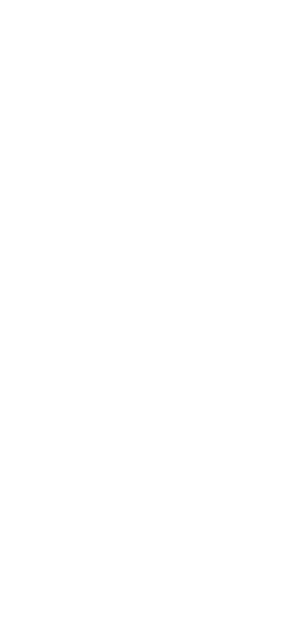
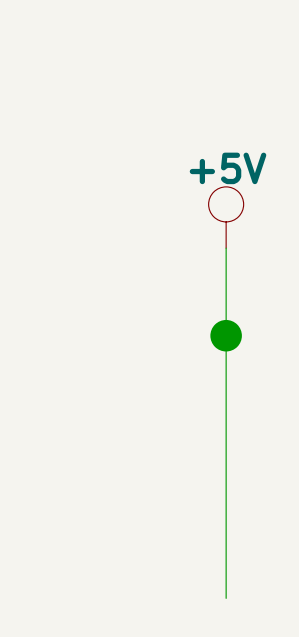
power symbol: none -> +5V (226, 217)
wire: none -> (226, 248) (226, 598)
junction: none -> (226, 335)

